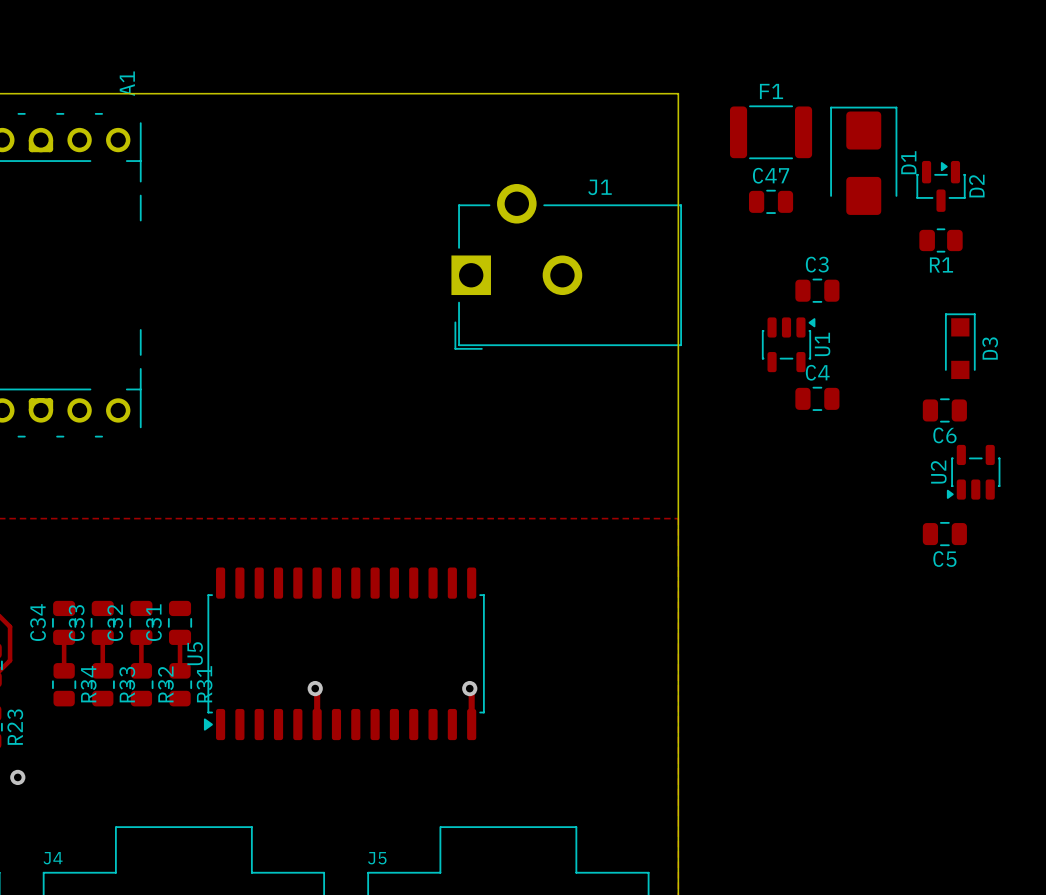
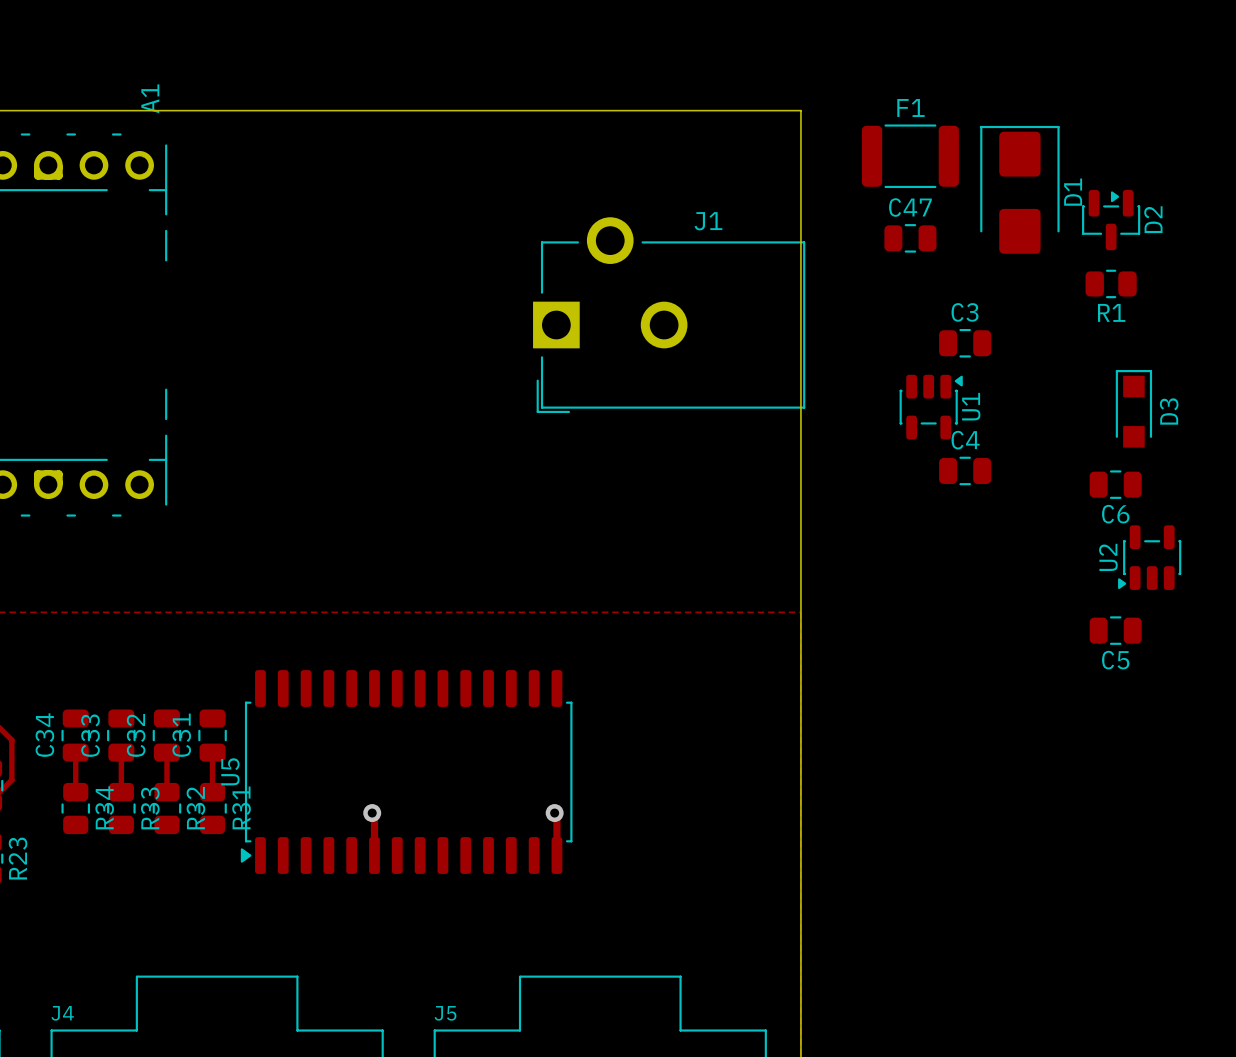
via: (17, 777) -> none

